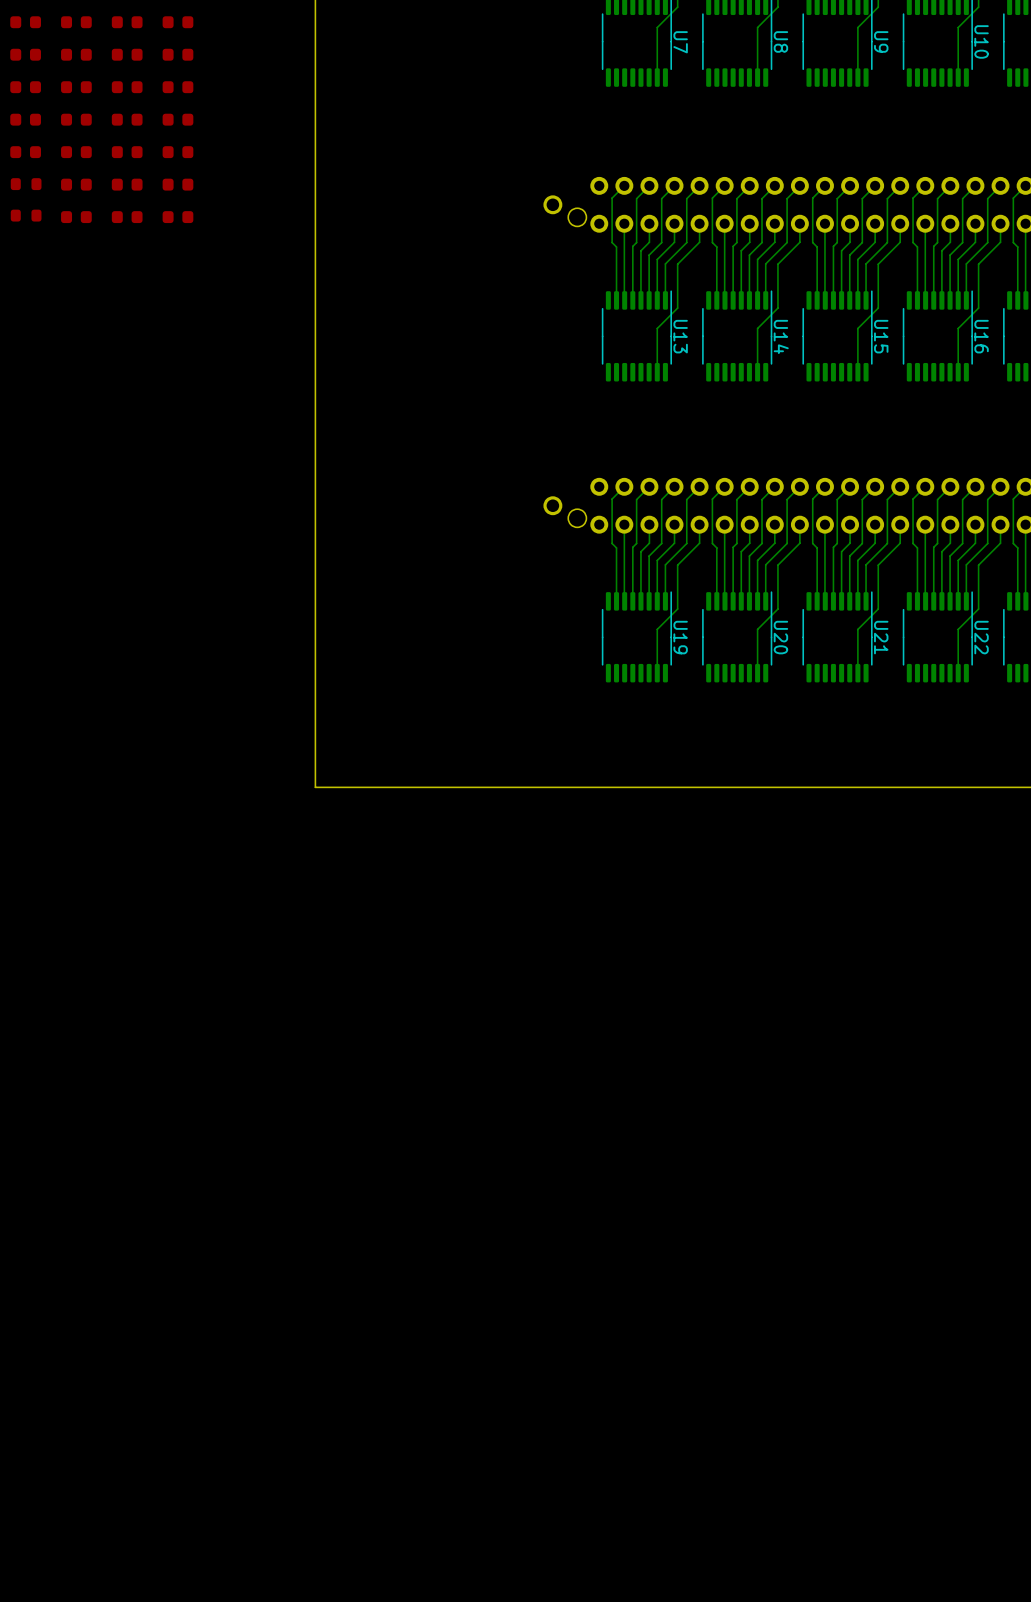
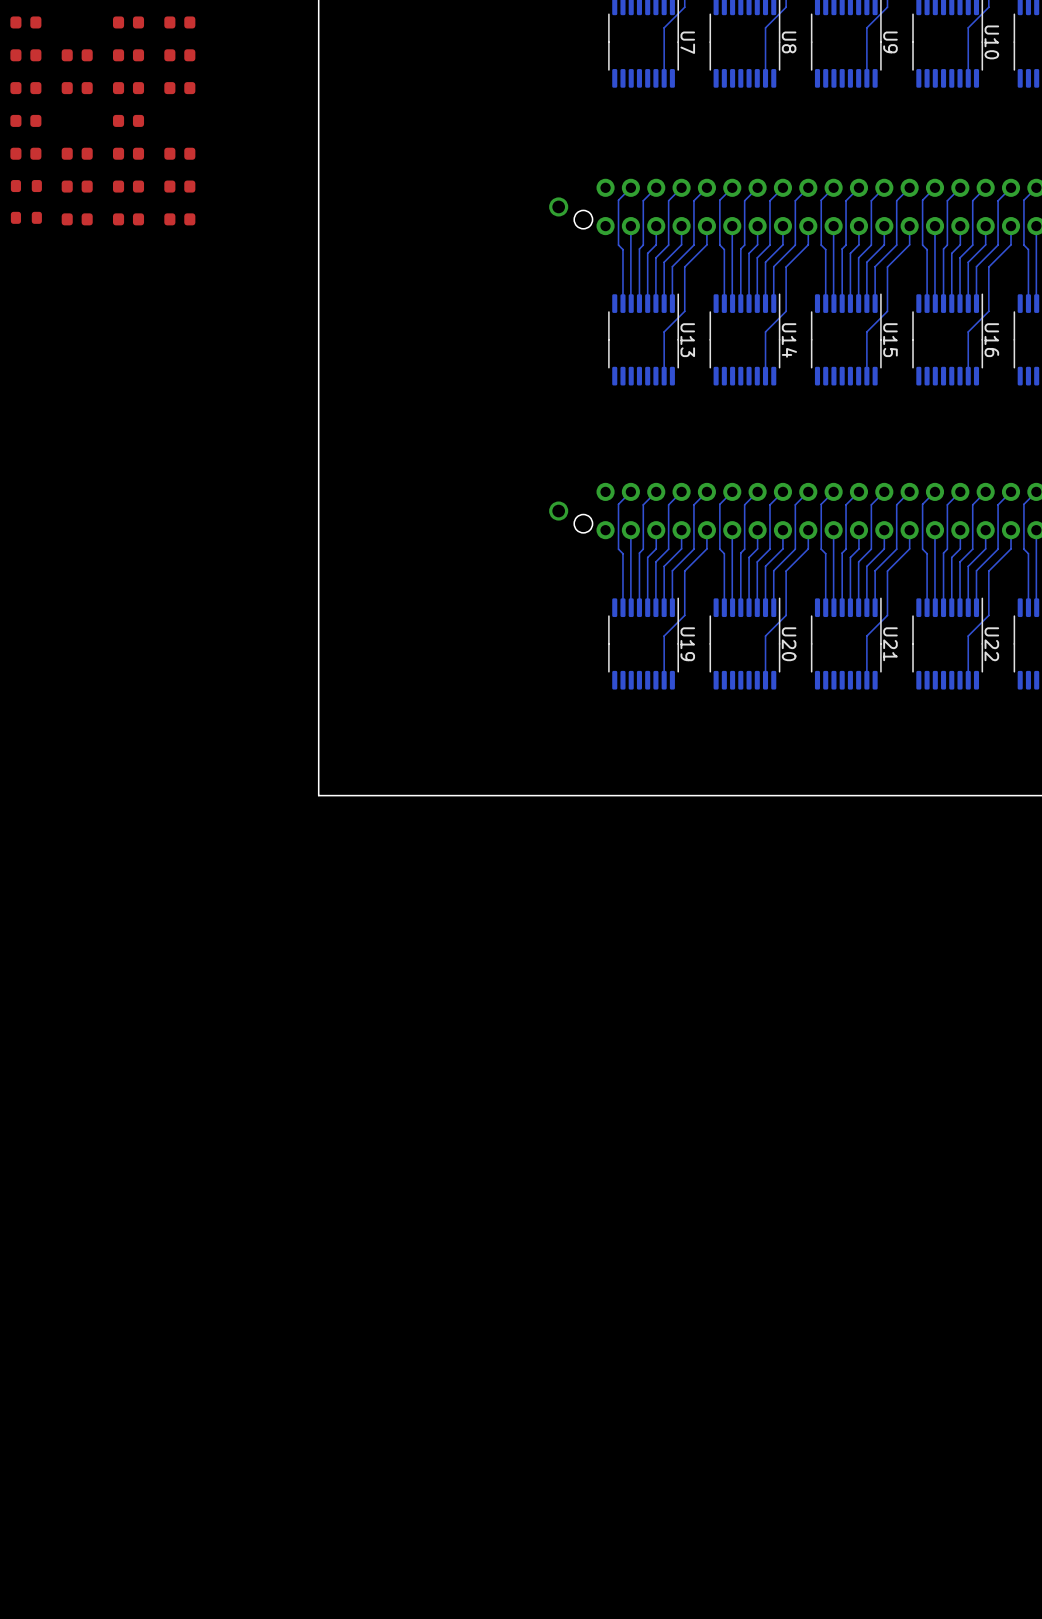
part: (76, 22) -> none
part: (76, 119) -> none
part: (177, 119) -> none

